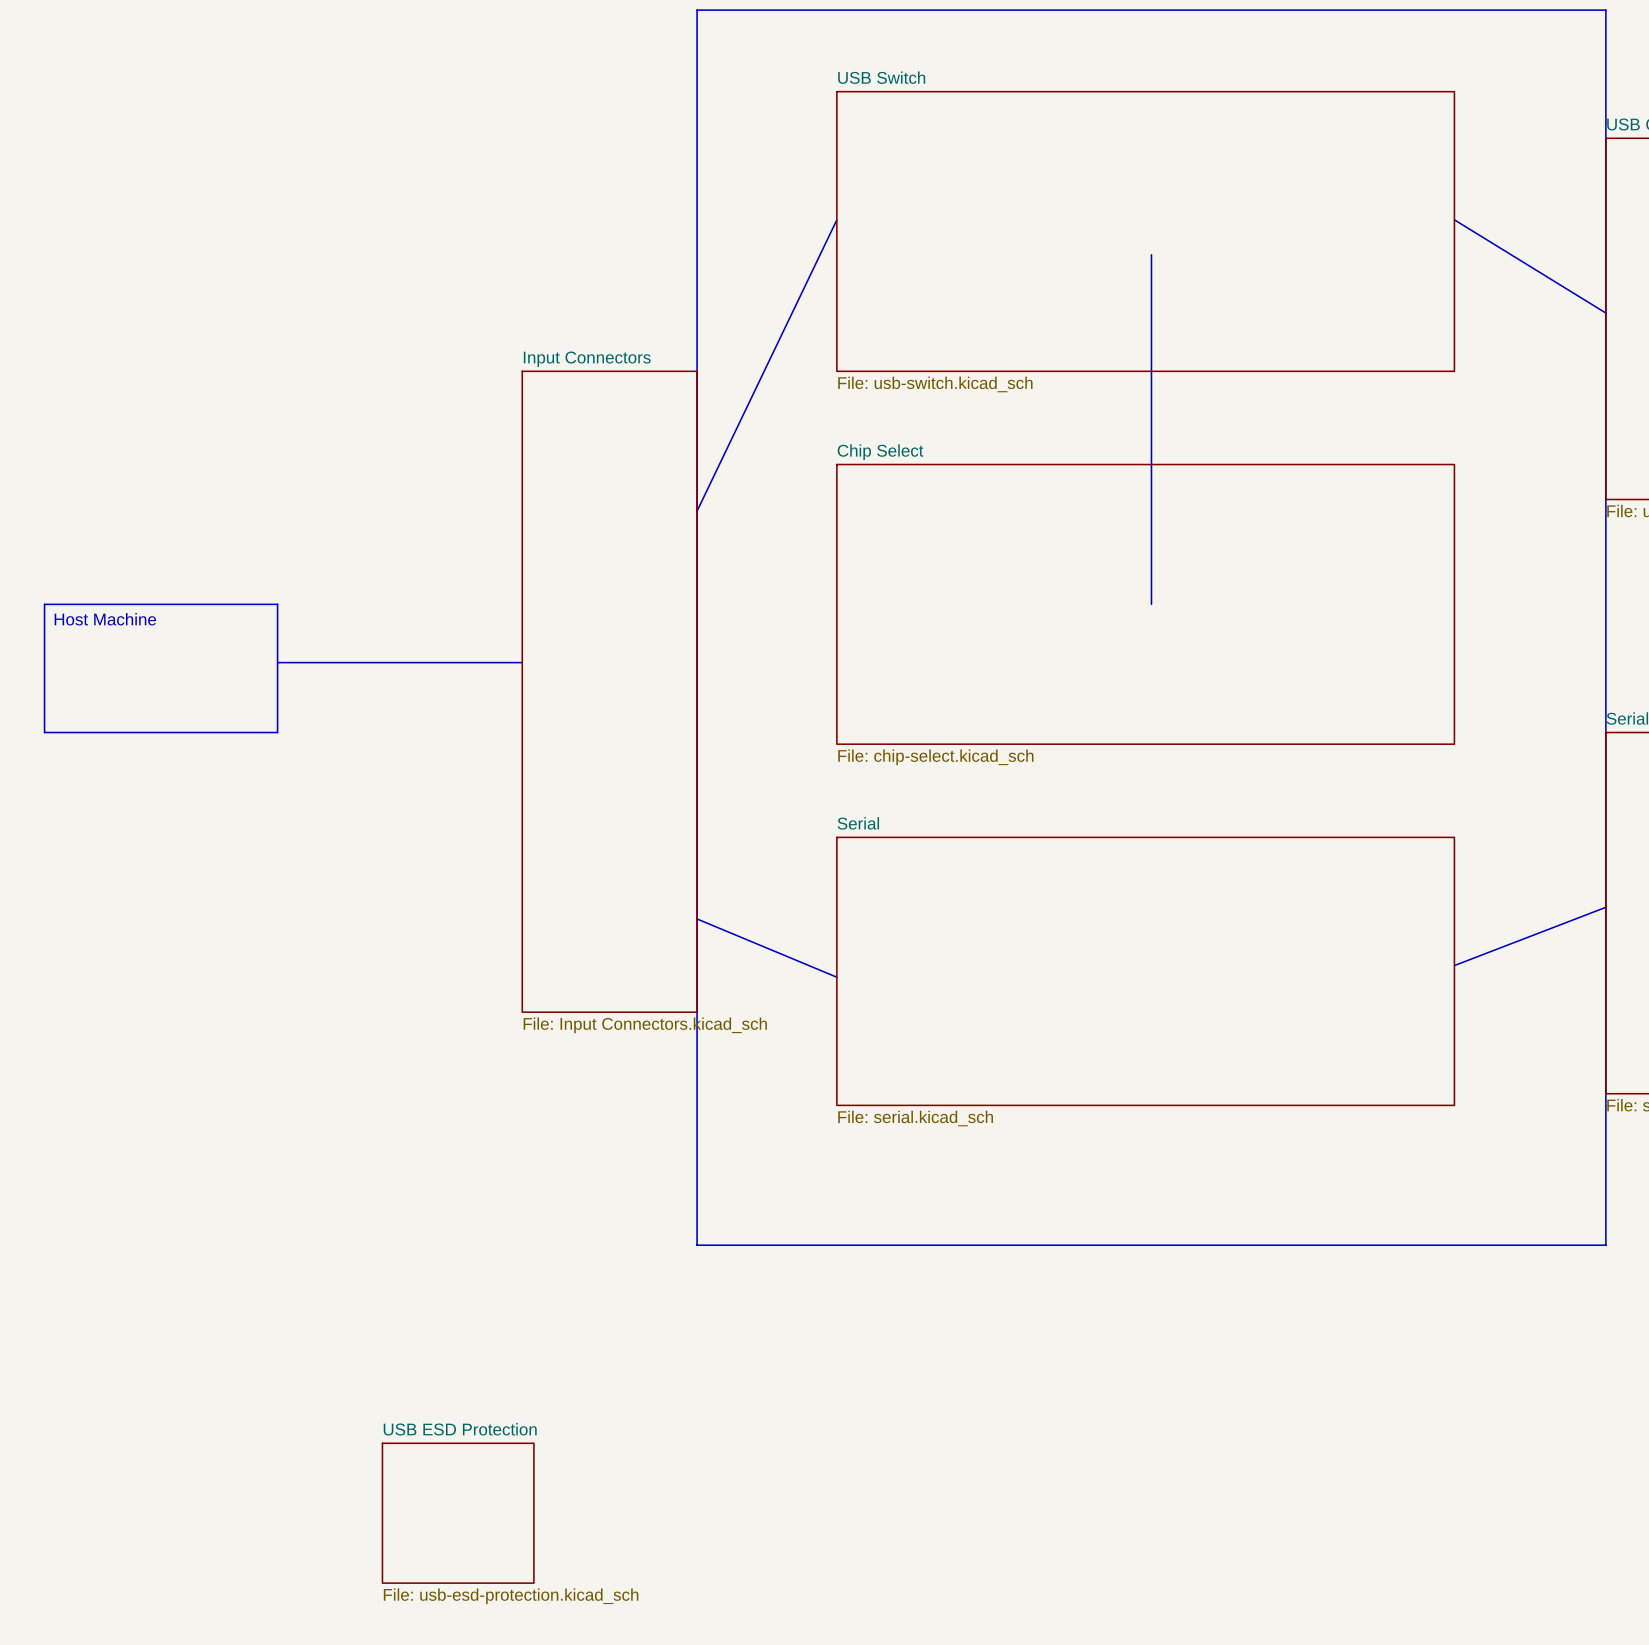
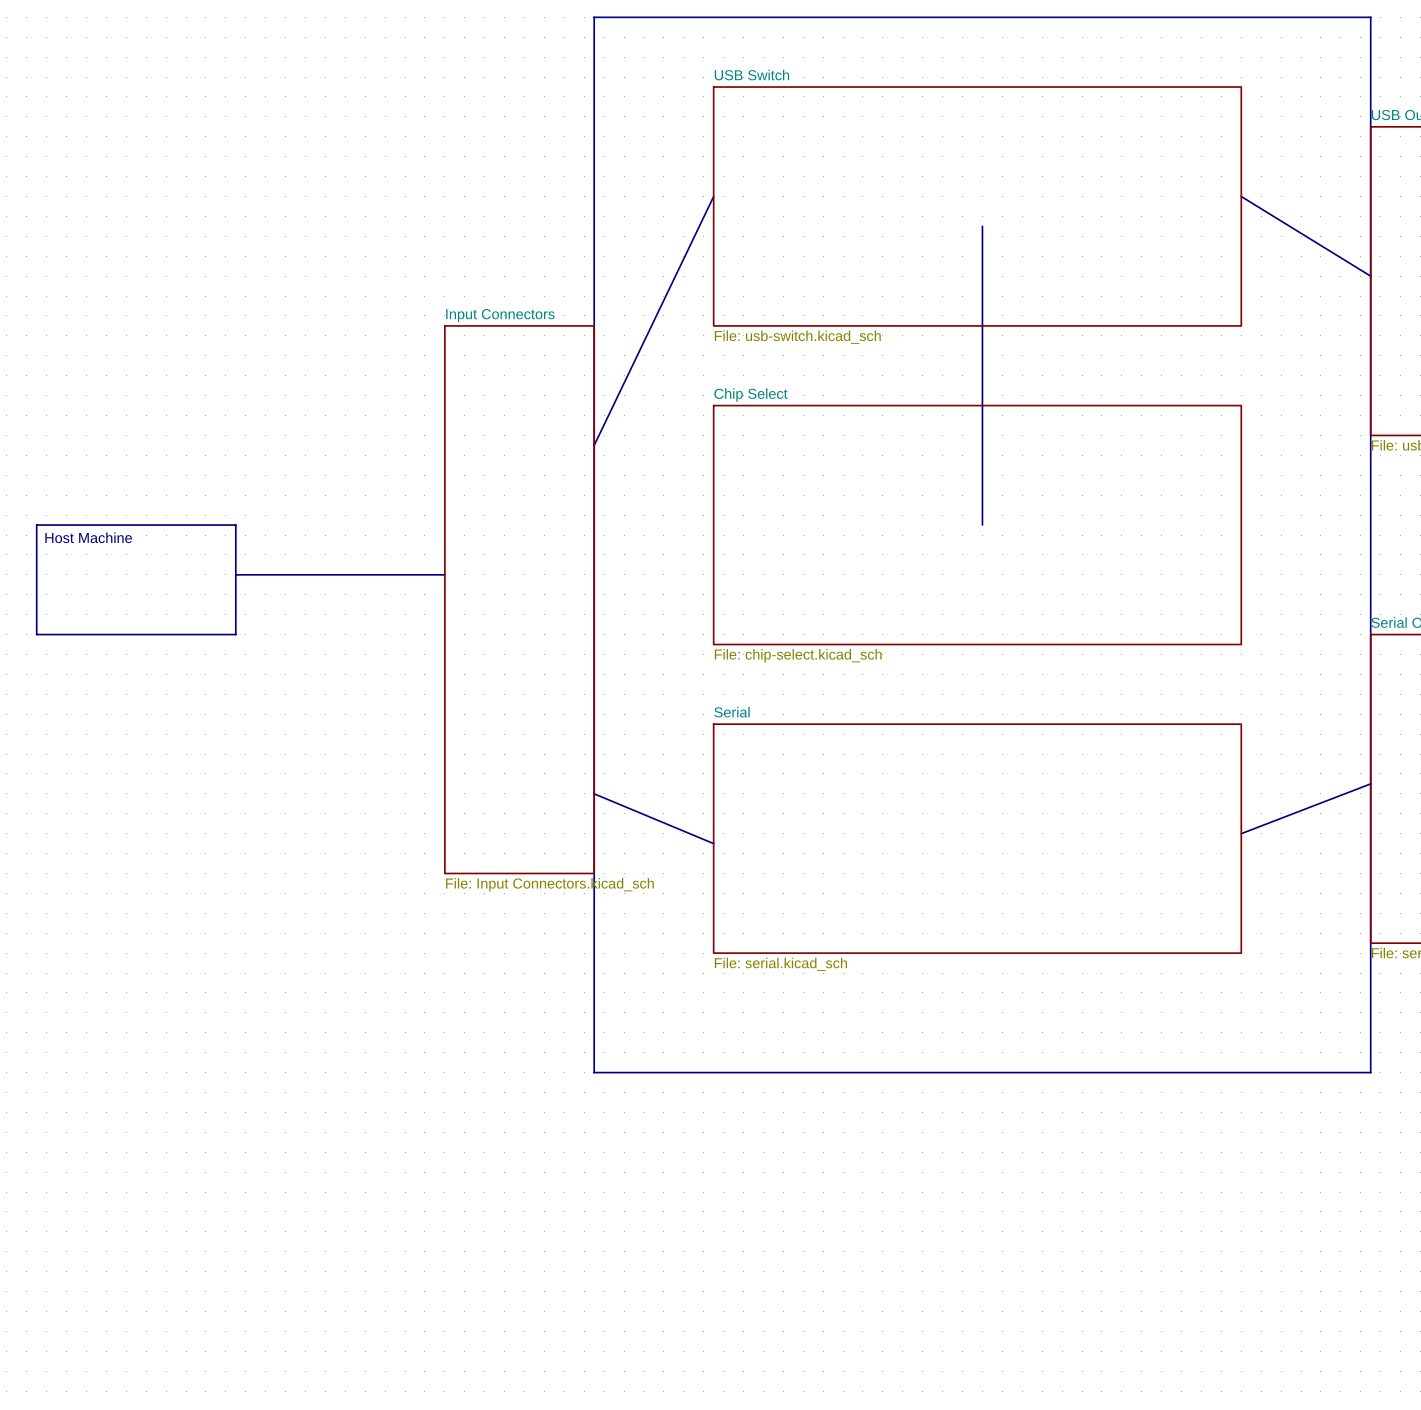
sheet USB ESD Protection: File: usb-esd-protection.kicad_sch (458, 1513) -> none

